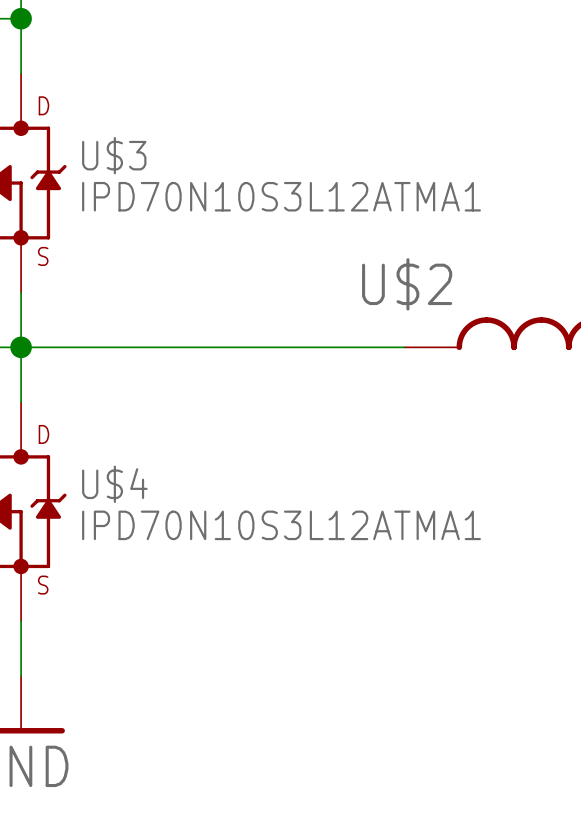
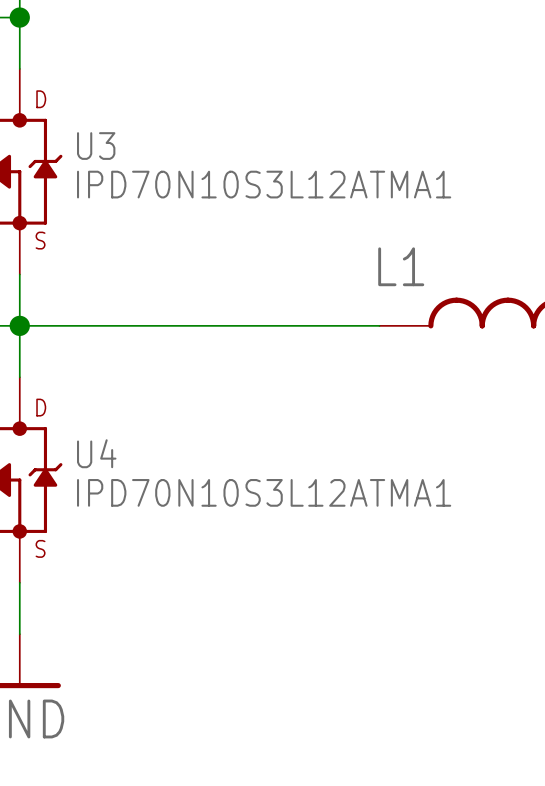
U$3 name: U$3 (114, 155) -> U3 (96, 146)
U$2 name: U$2 (407, 284) -> L1 (401, 266)
U$4 name: U$4 (114, 484) -> U4 (96, 453)

